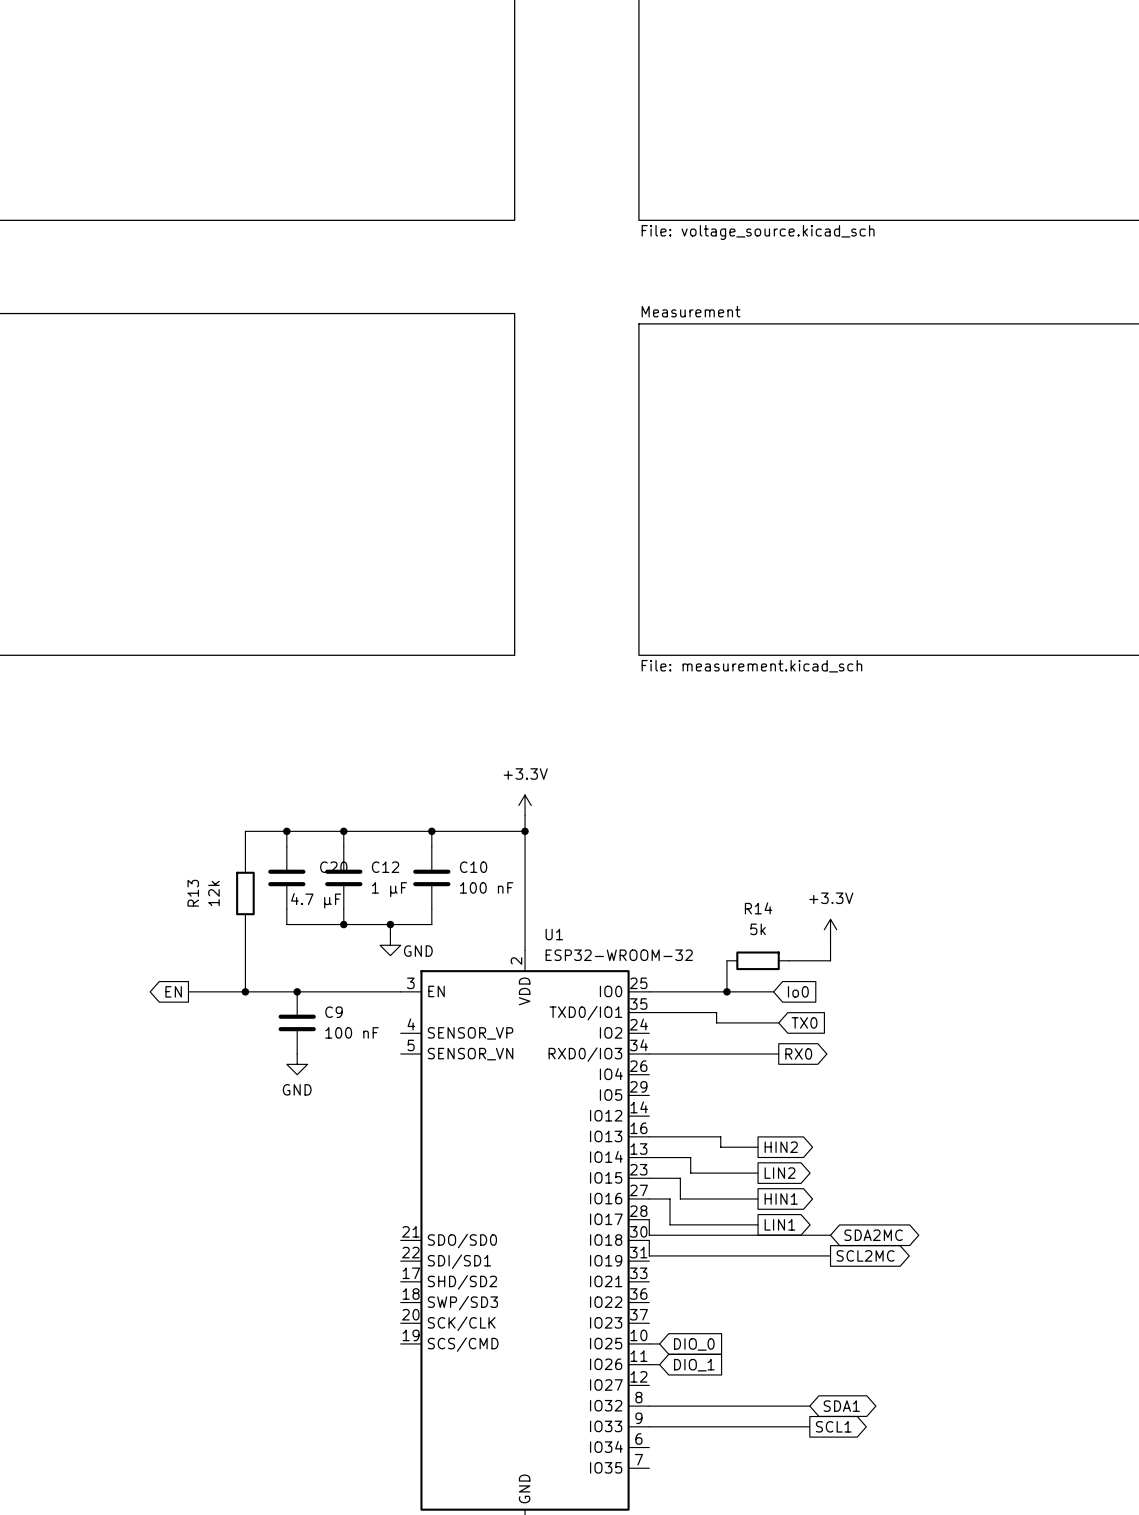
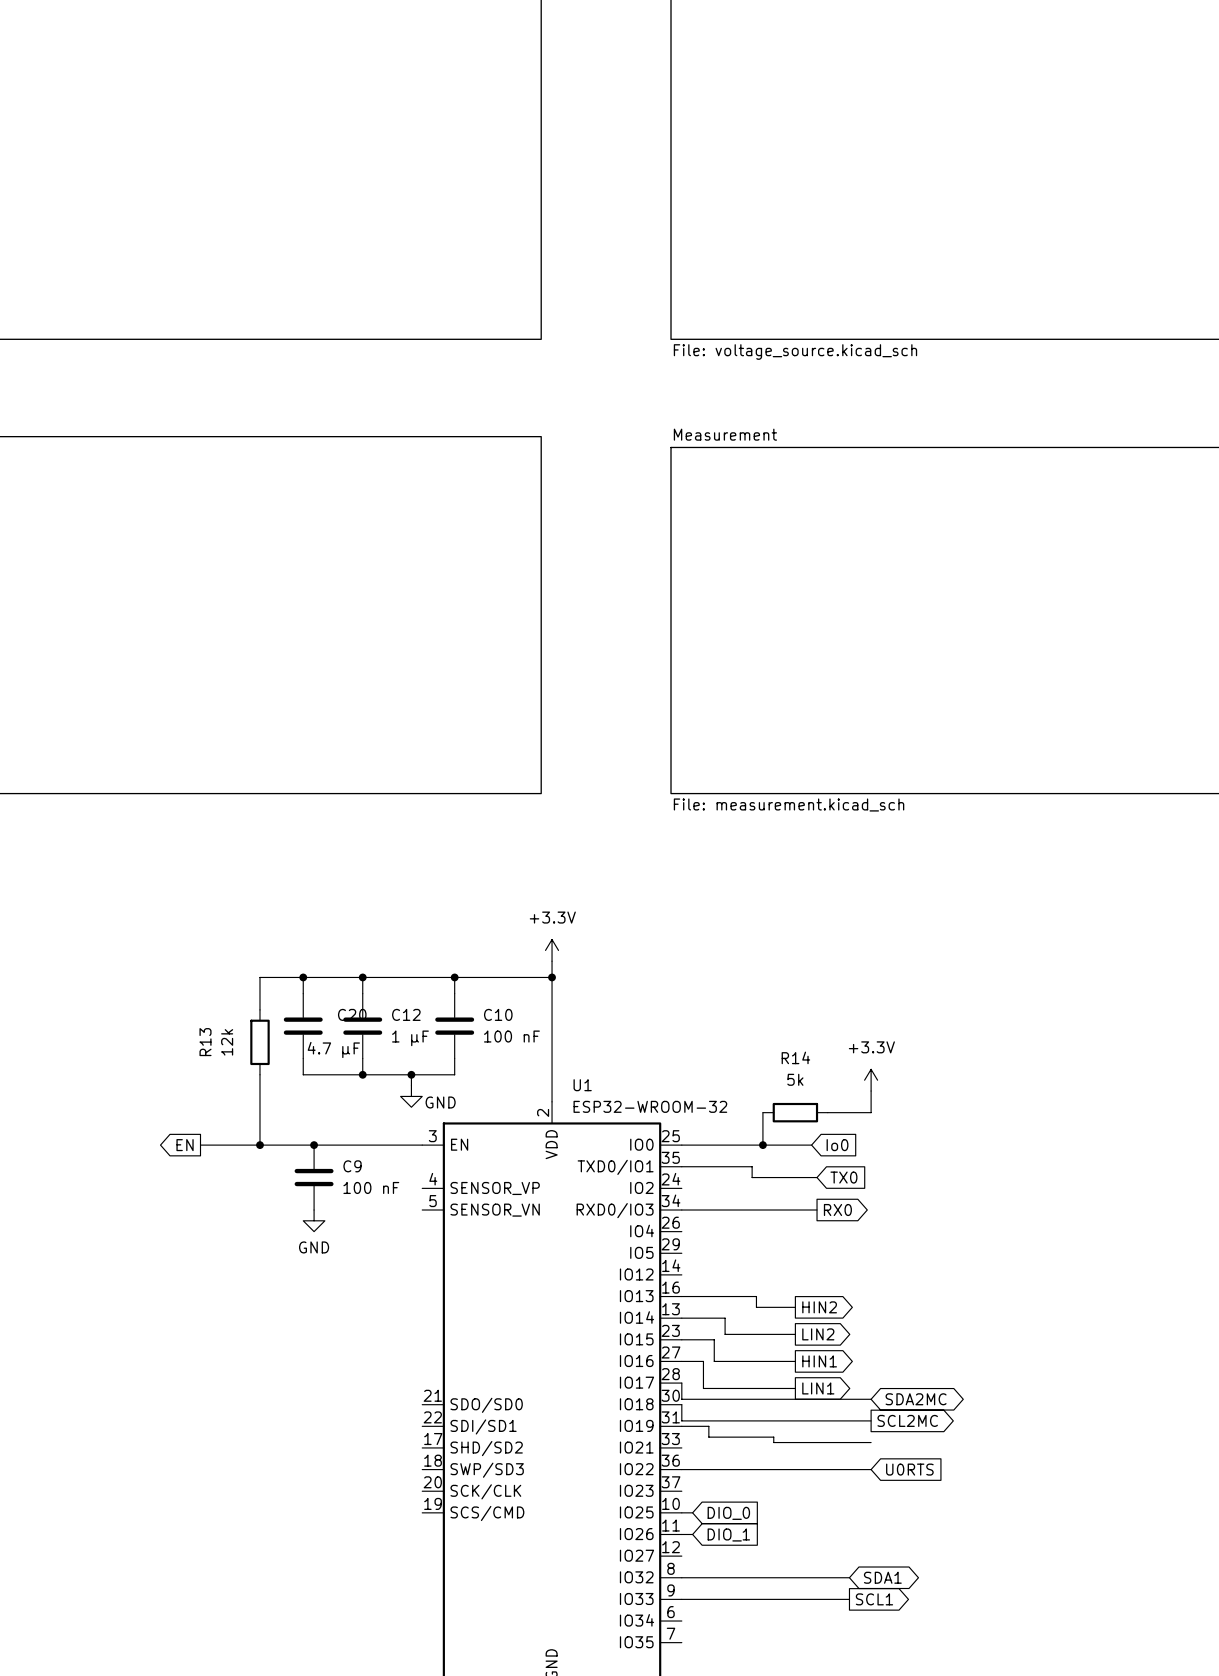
wire: none -> (681, 1426) (708, 1426) (708, 1437) (773, 1437) (773, 1442) (871, 1442)
wire: none -> (681, 1469) (871, 1469)
global label: none -> U0RTS (909, 1469)

